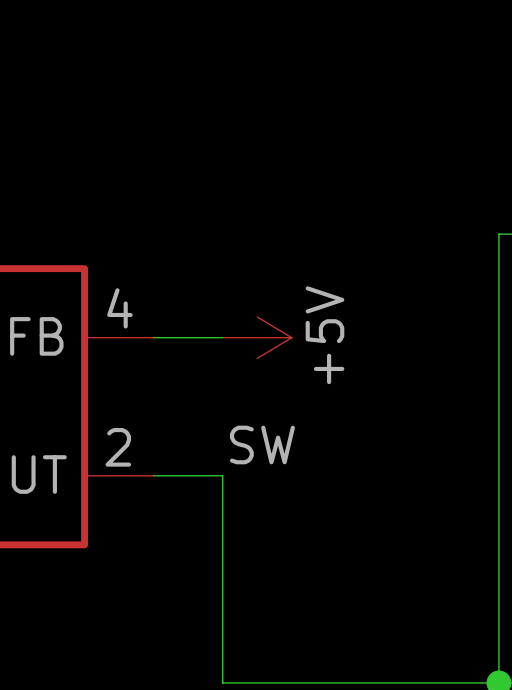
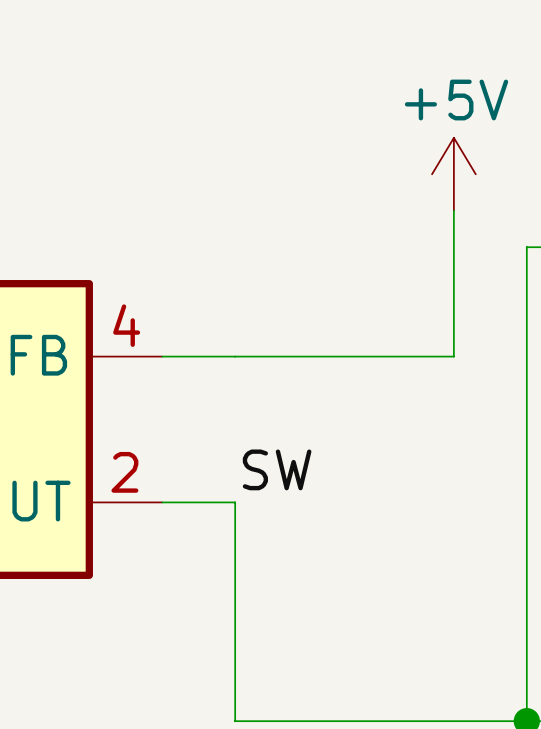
wire: none -> (453, 210) (453, 356) (235, 356)
power symbol rotation: 0° (257, 337) -> 90° counterclockwise (453, 174)
power symbol position: +5V (257, 337) -> +5V (453, 174)

